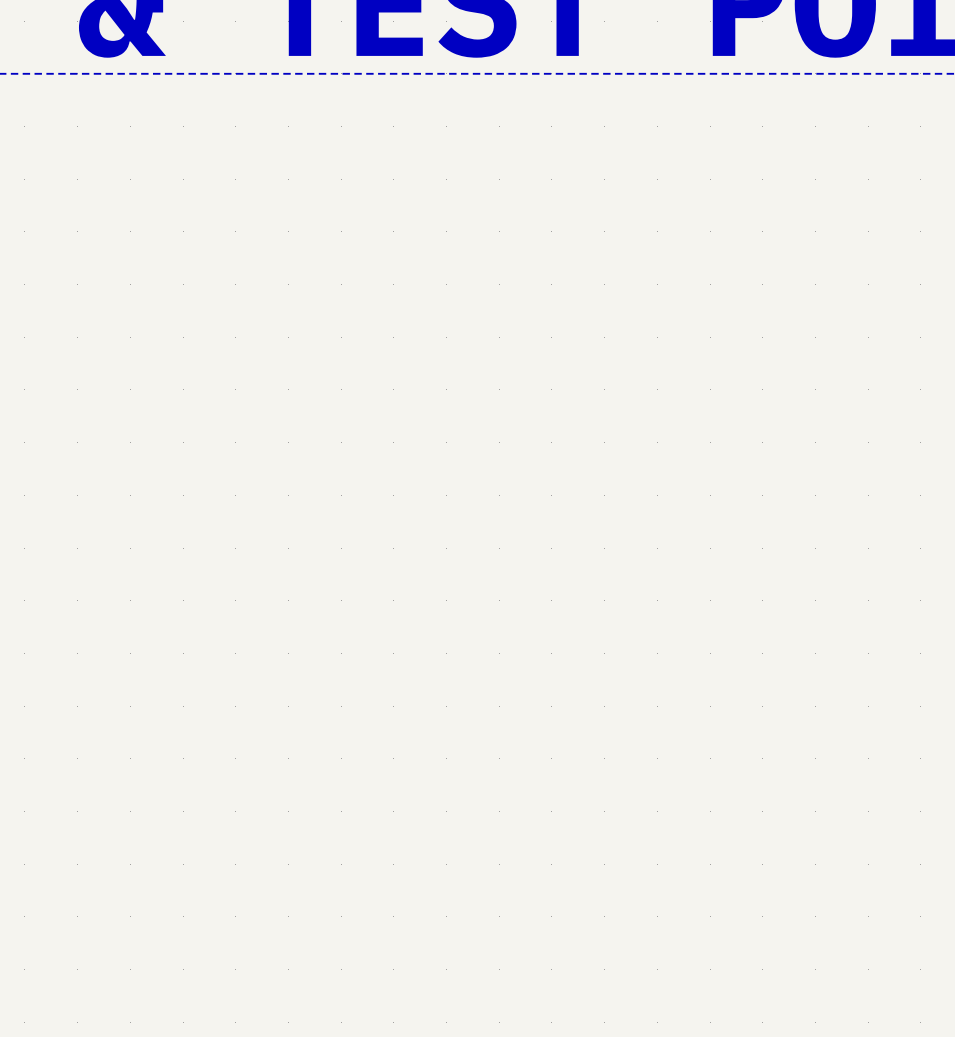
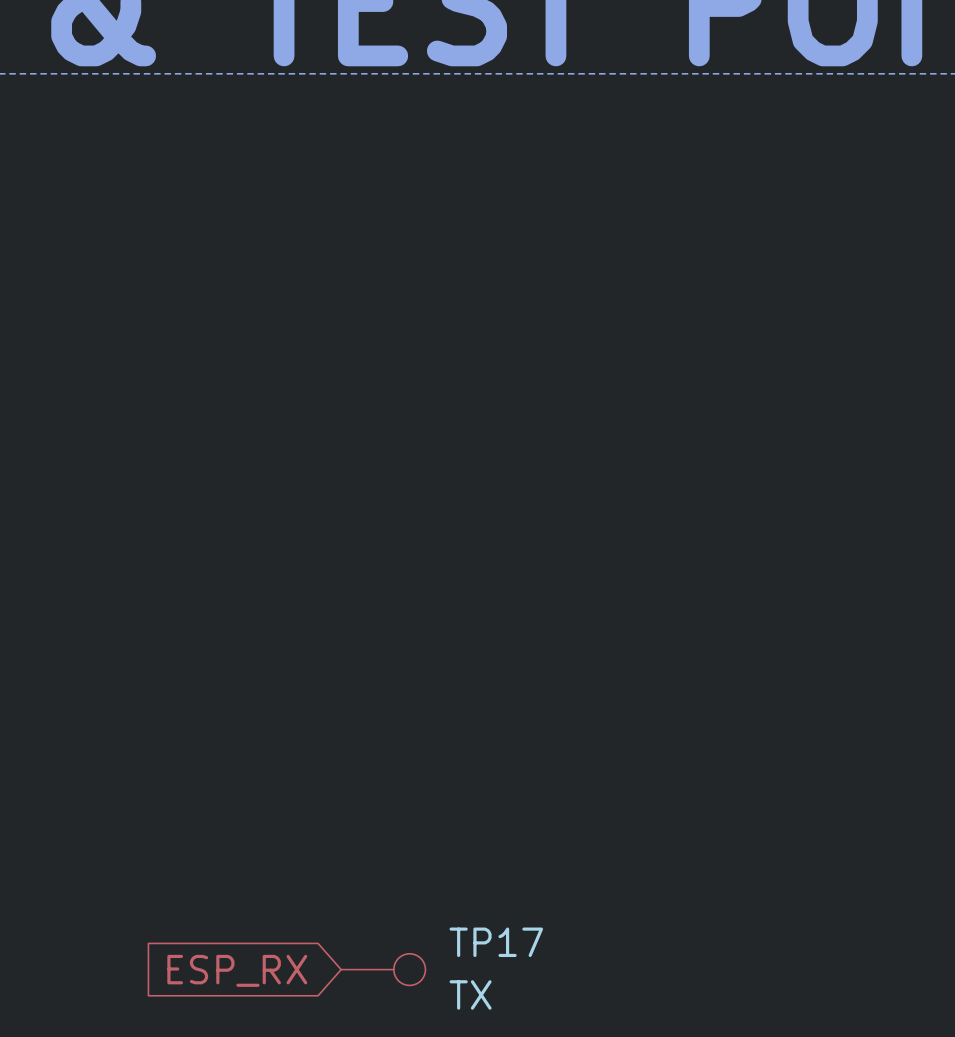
TP17: none -> TX (383, 969)
global label: none -> ESP_RX (237, 970)

